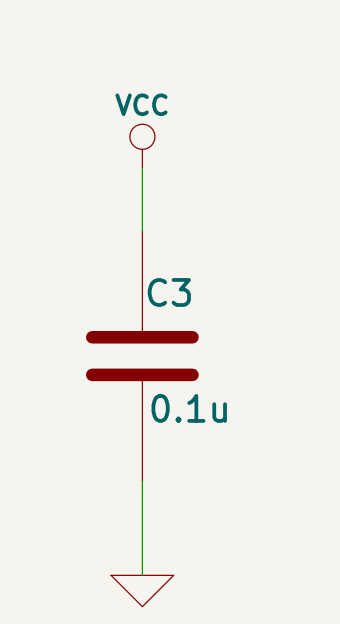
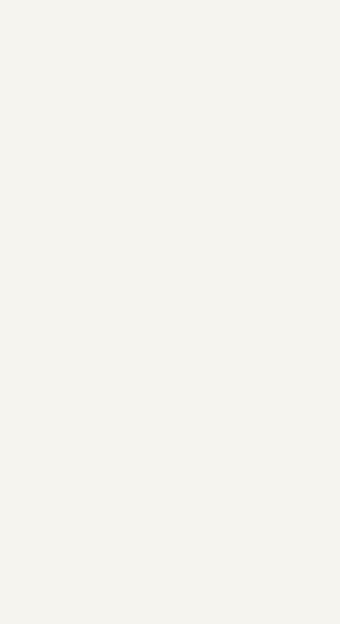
power symbol: VCC (142, 146) -> none
wire: (142, 168) (142, 230) -> none
C3: 0.1u (142, 356) -> none
wire: (142, 481) (142, 575) -> none
power symbol: (142, 591) -> none

